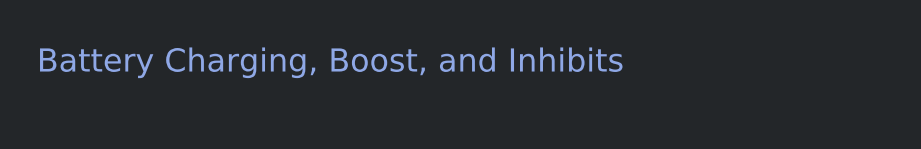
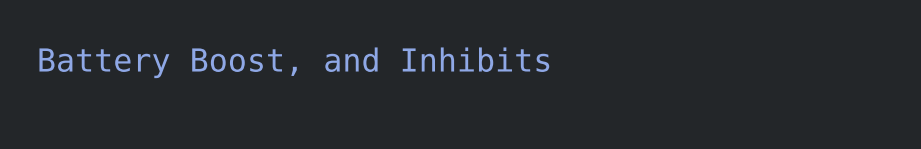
text: Battery Charging, Boost, and Inhibits (331, 62) -> Battery Boost, and Inhibits (294, 62)

